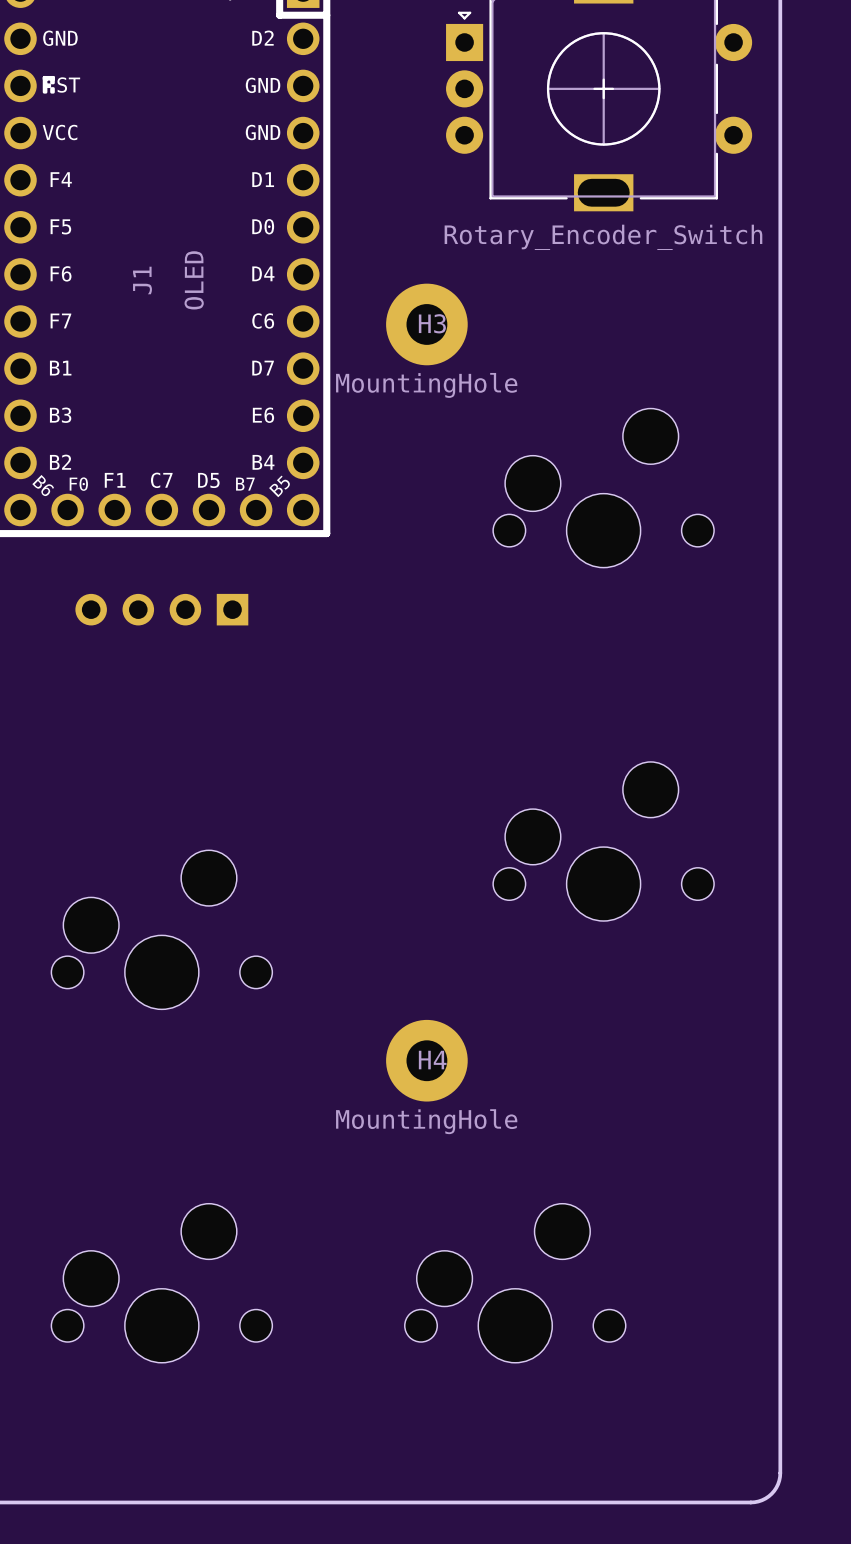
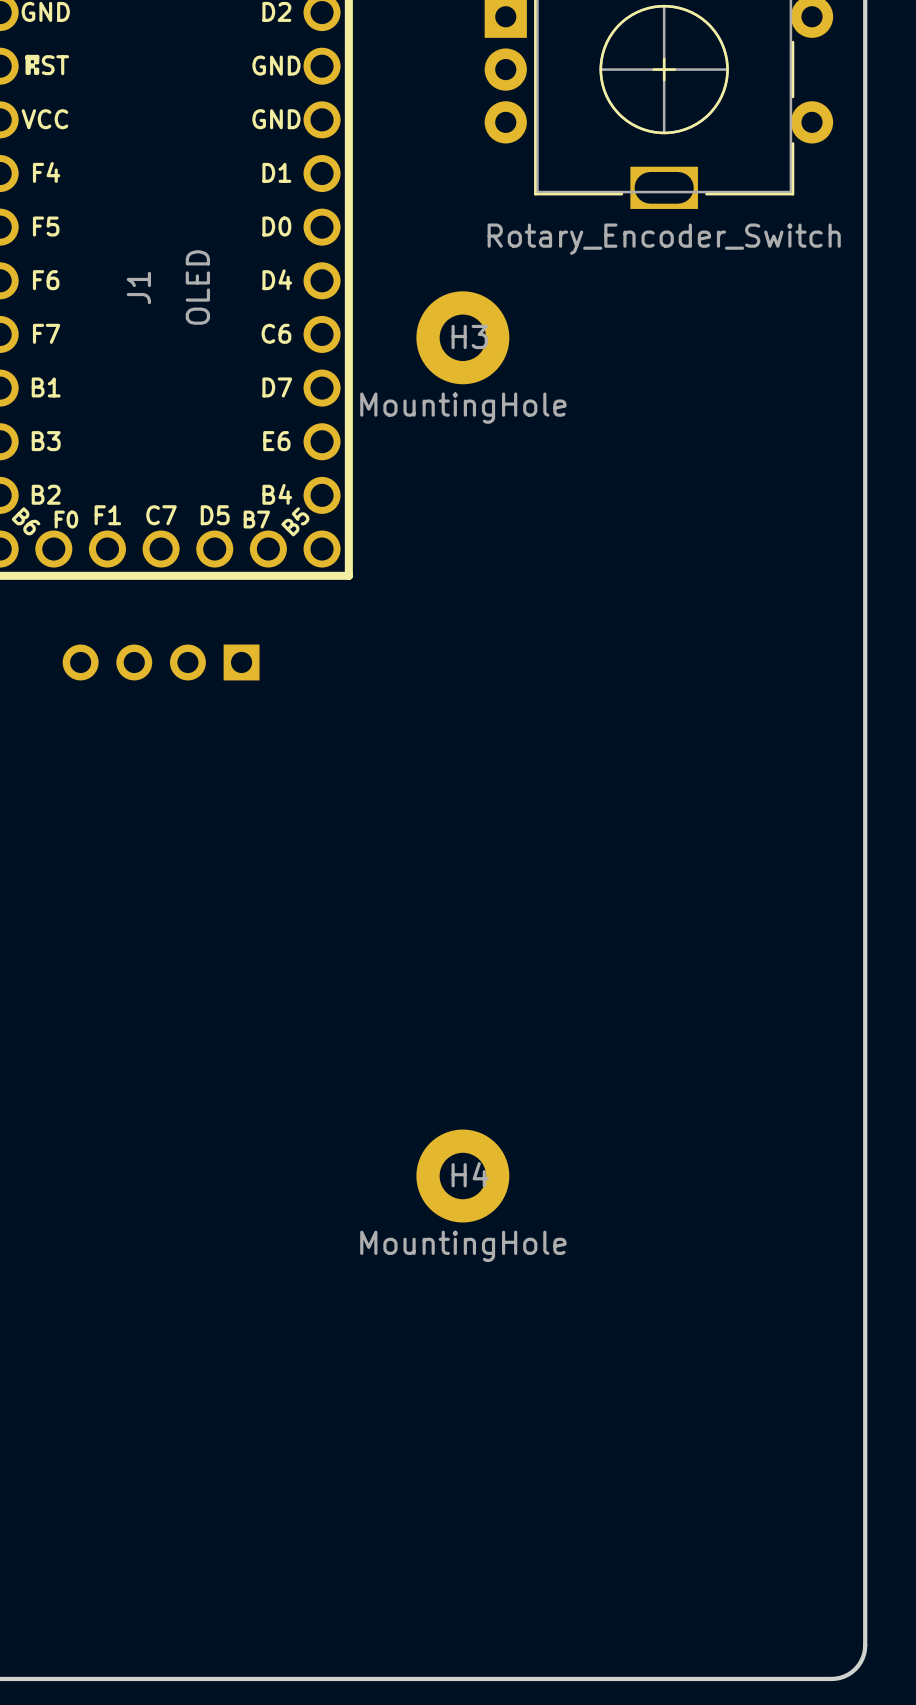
part: (603, 488) -> none
part: (603, 841) -> none
part: (161, 929) -> none
part: (161, 1283) -> none
part: (515, 1283) -> none

